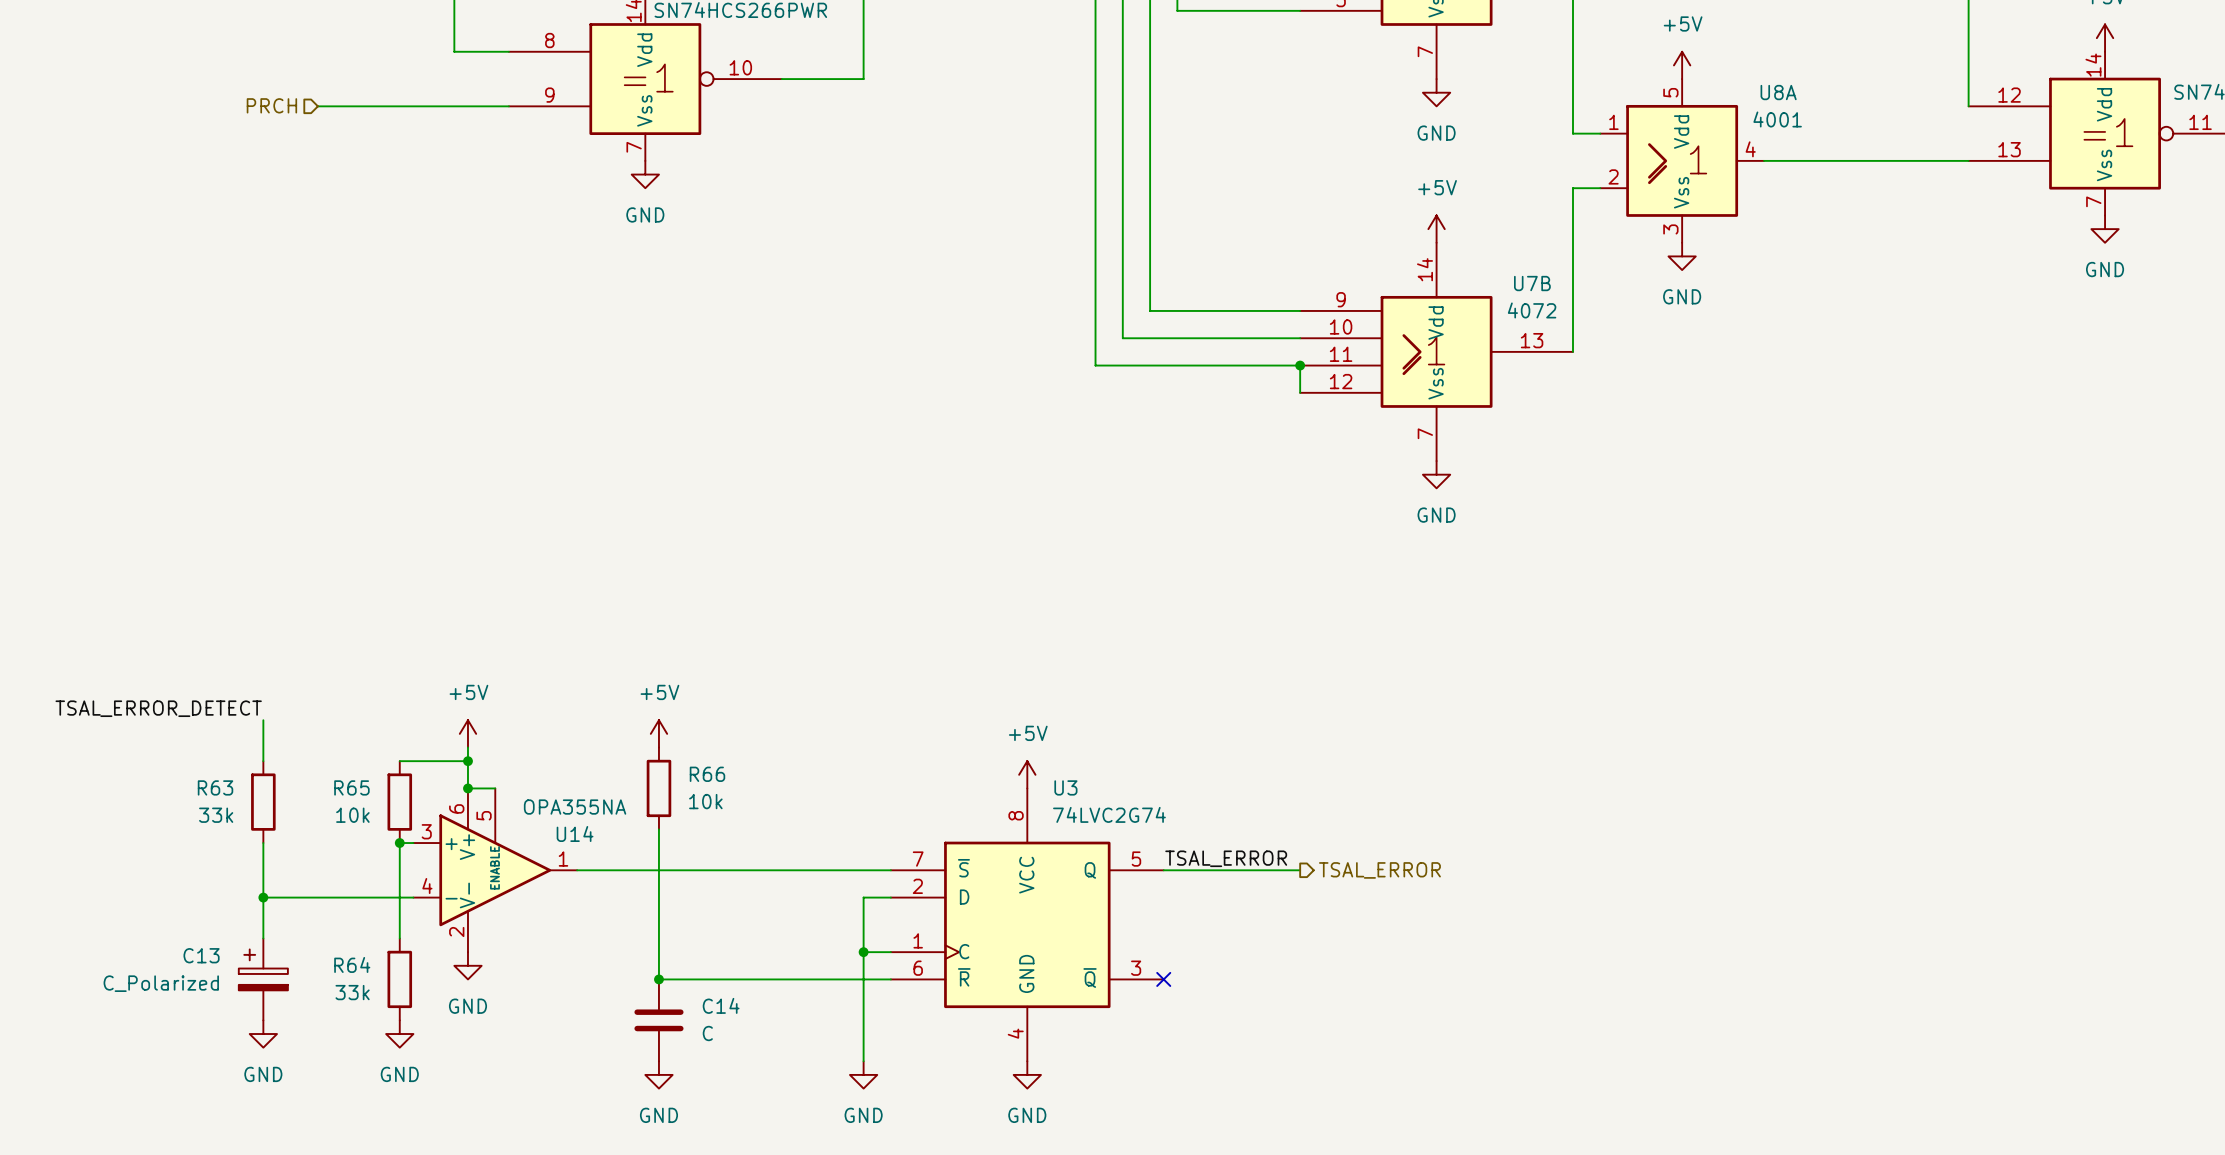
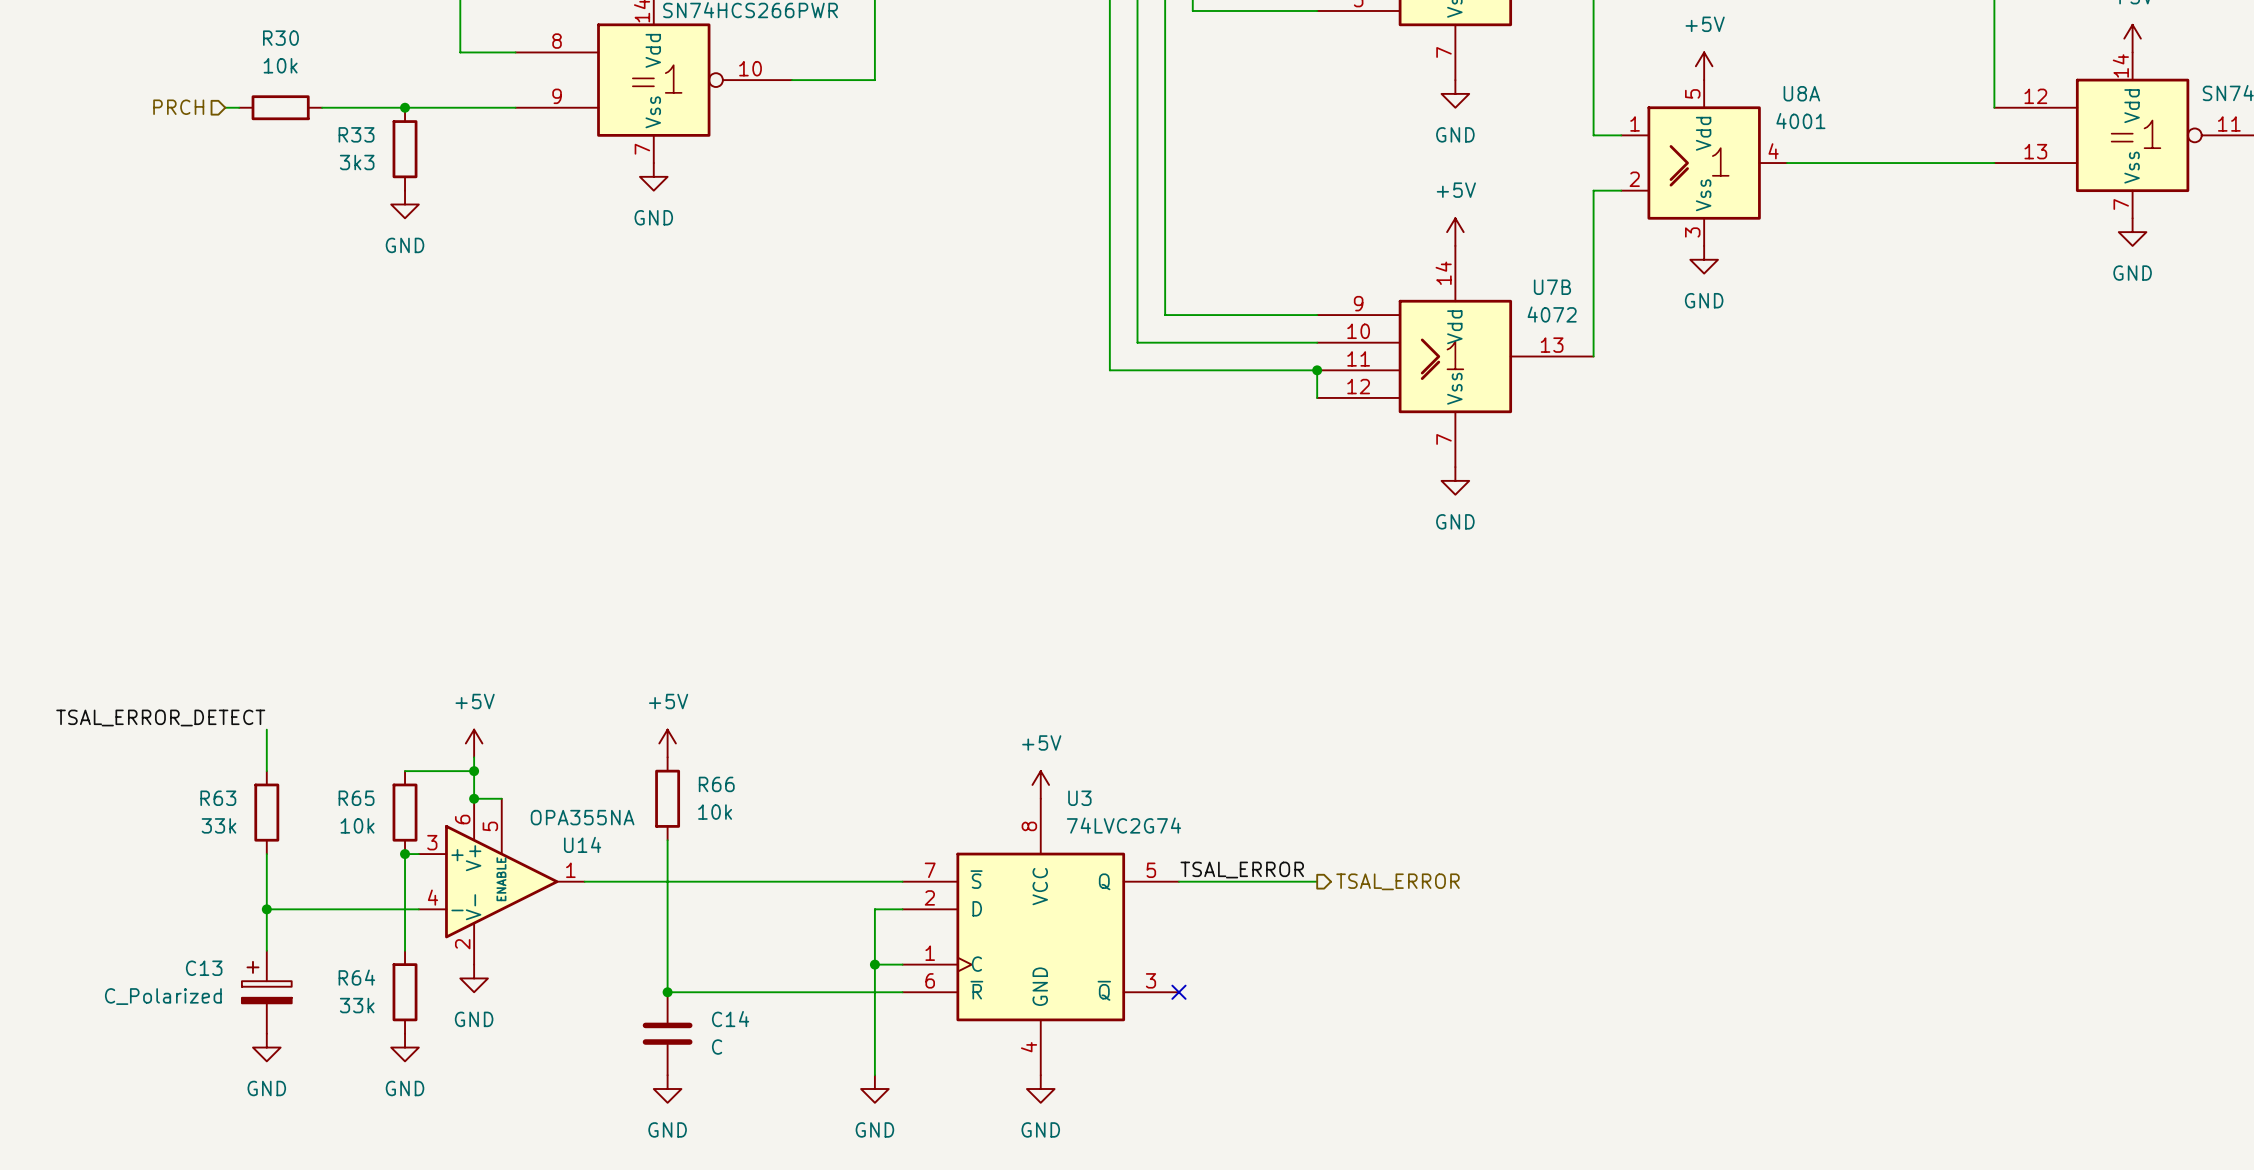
hierarchical label position: PRCH (271, 105) -> PRCH (178, 107)
wire: none -> (225, 107) (239, 107)
R30: none -> 10k (280, 107)
junction: none -> (405, 107)
R33: none -> 3k3 (405, 149)
power symbol: none -> GND (405, 204)

